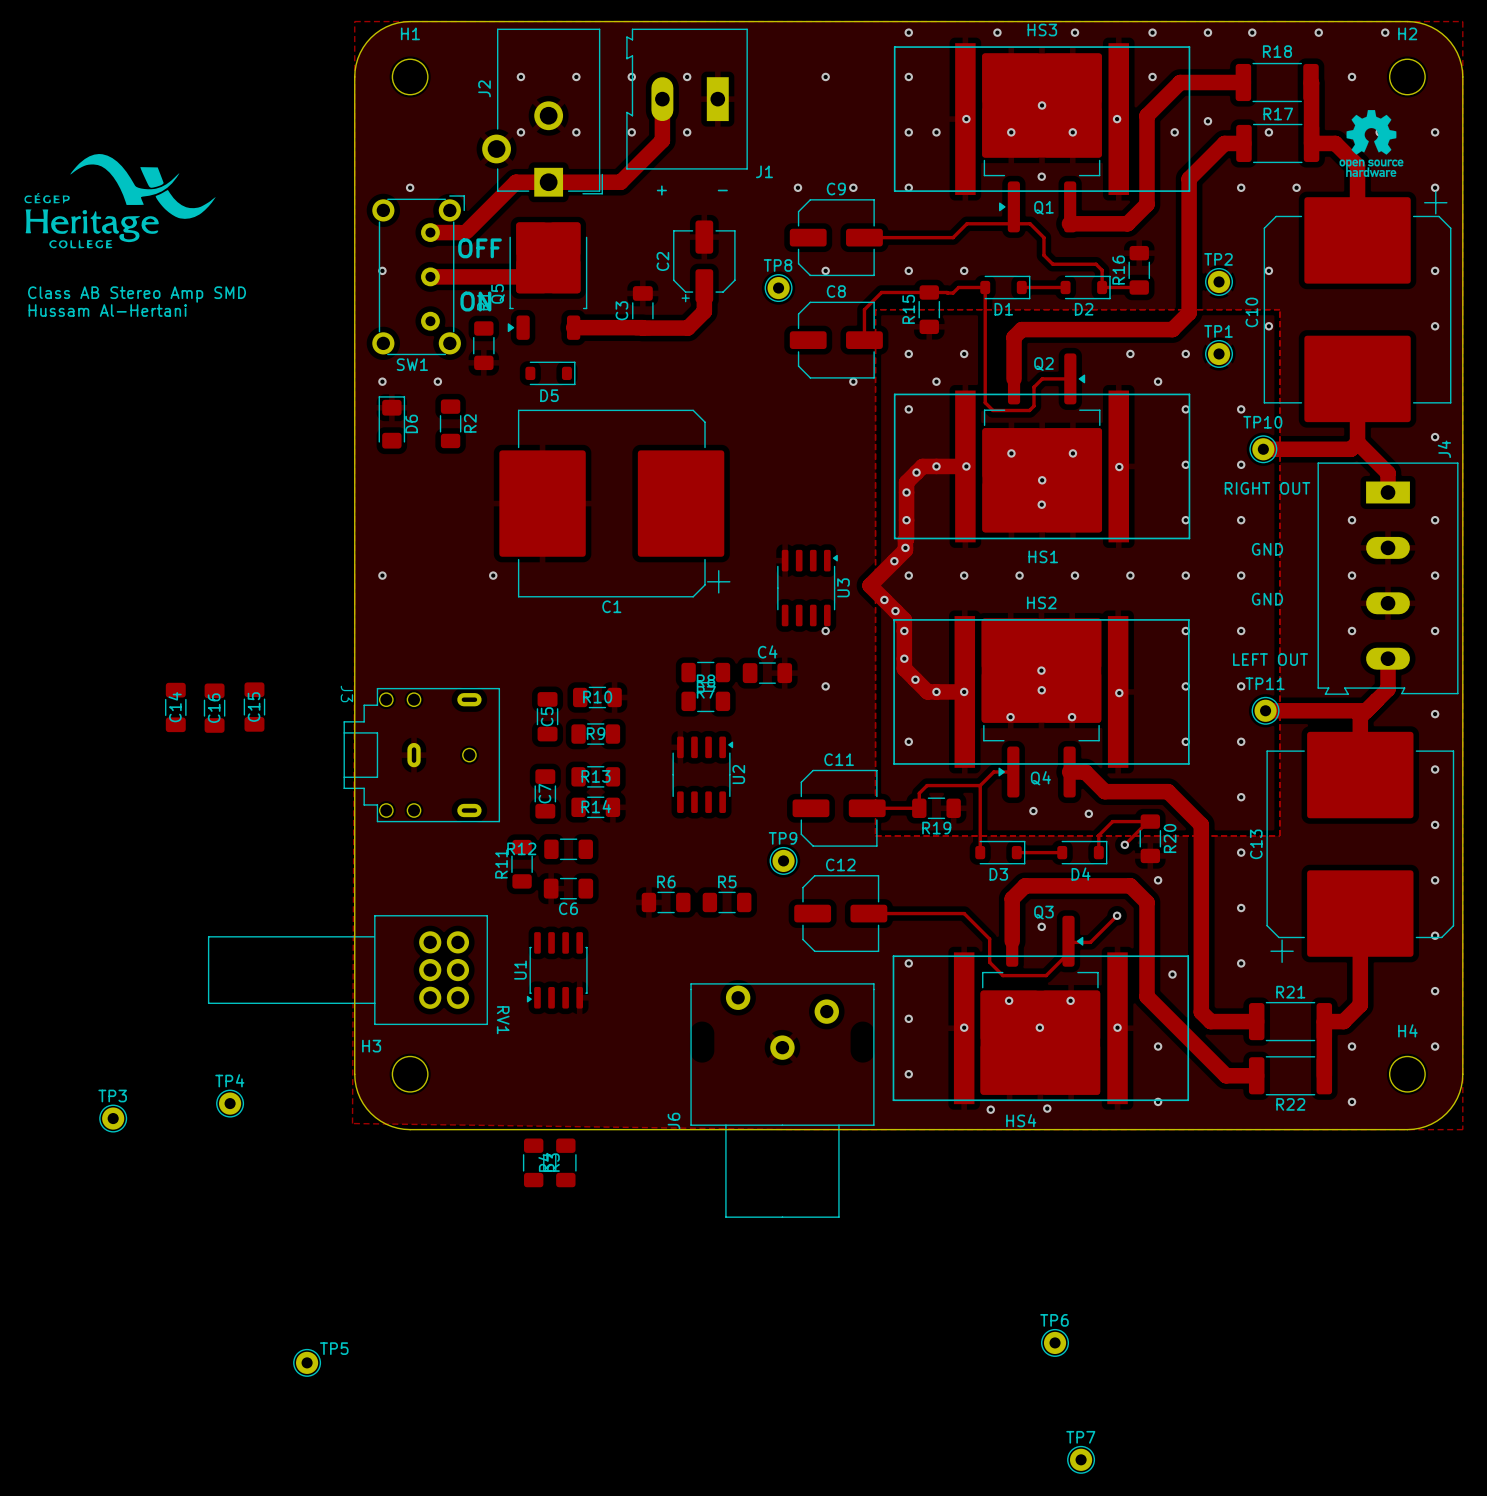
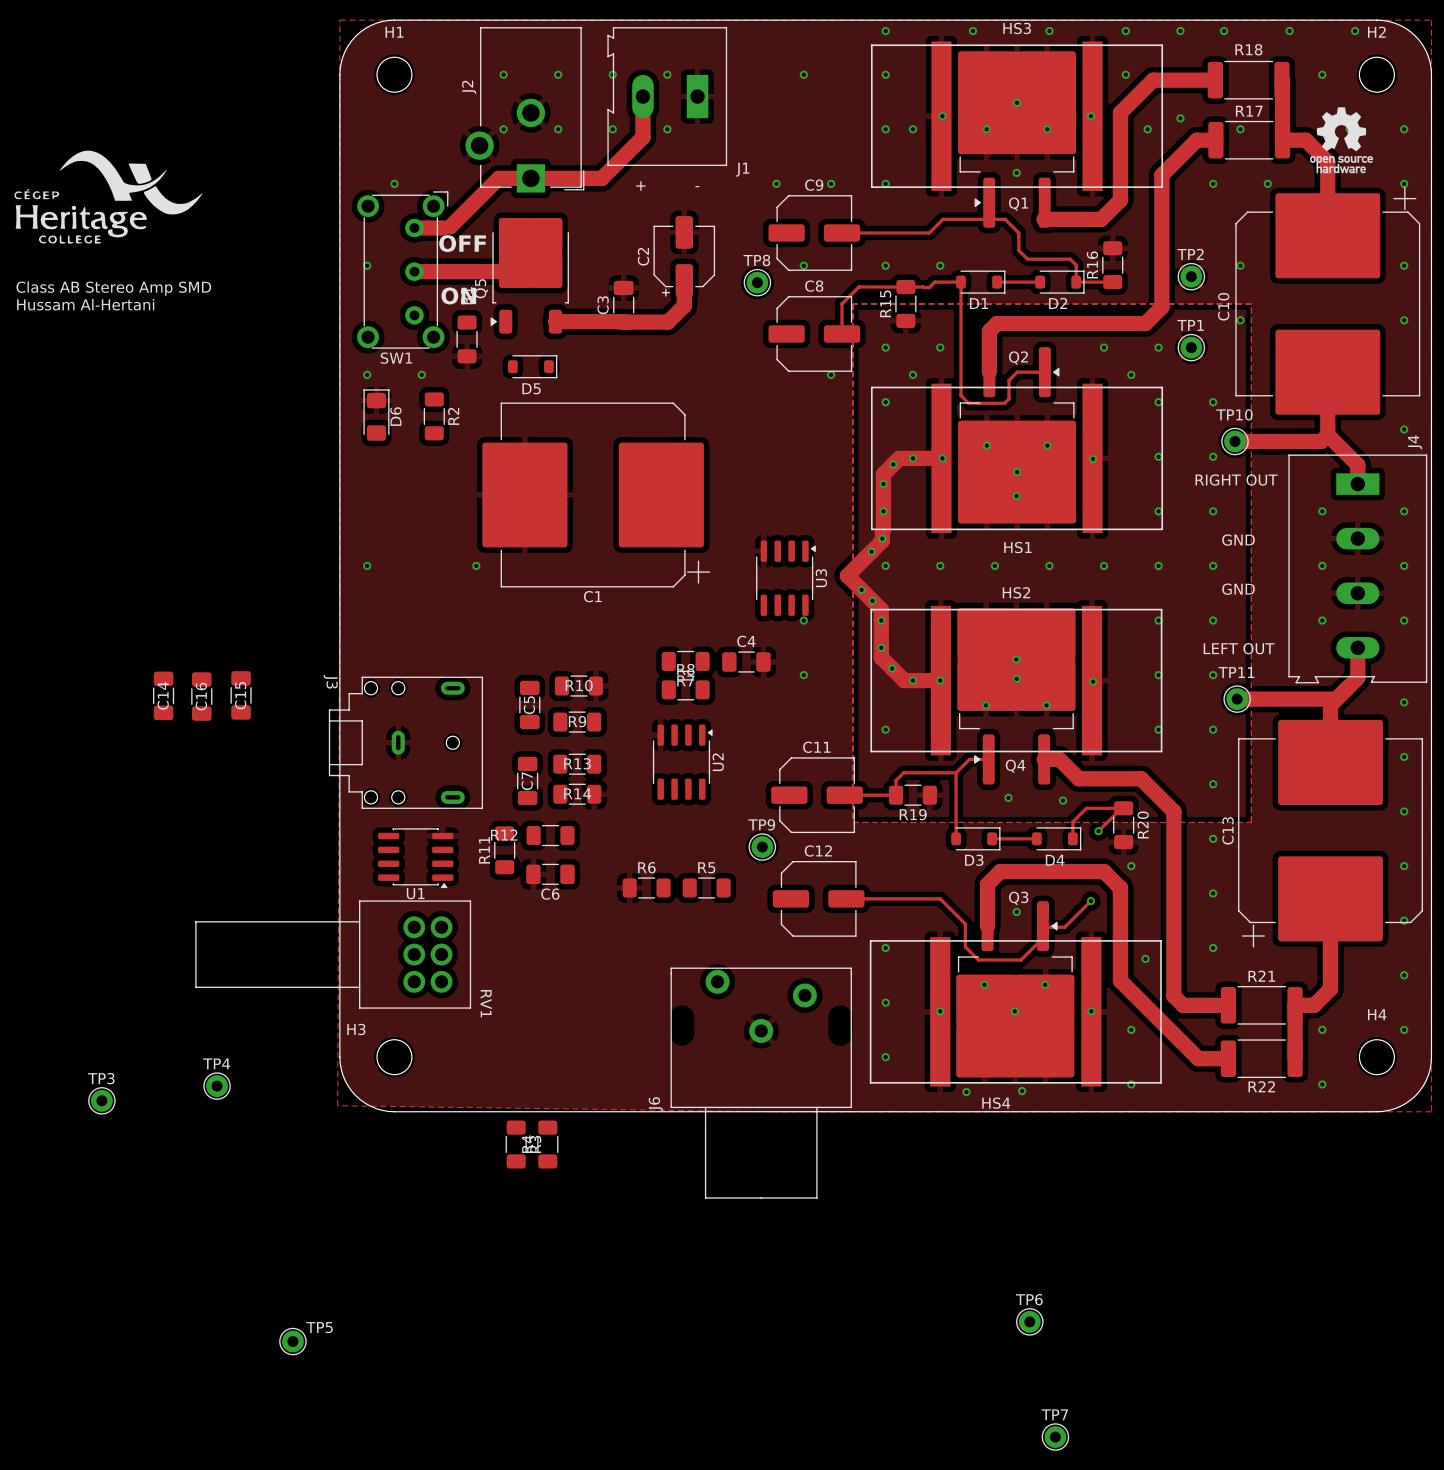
U1 rotation: 0° (557, 970) -> 90° counterclockwise (415, 858)
U1 position: (557, 970) -> (415, 858)

